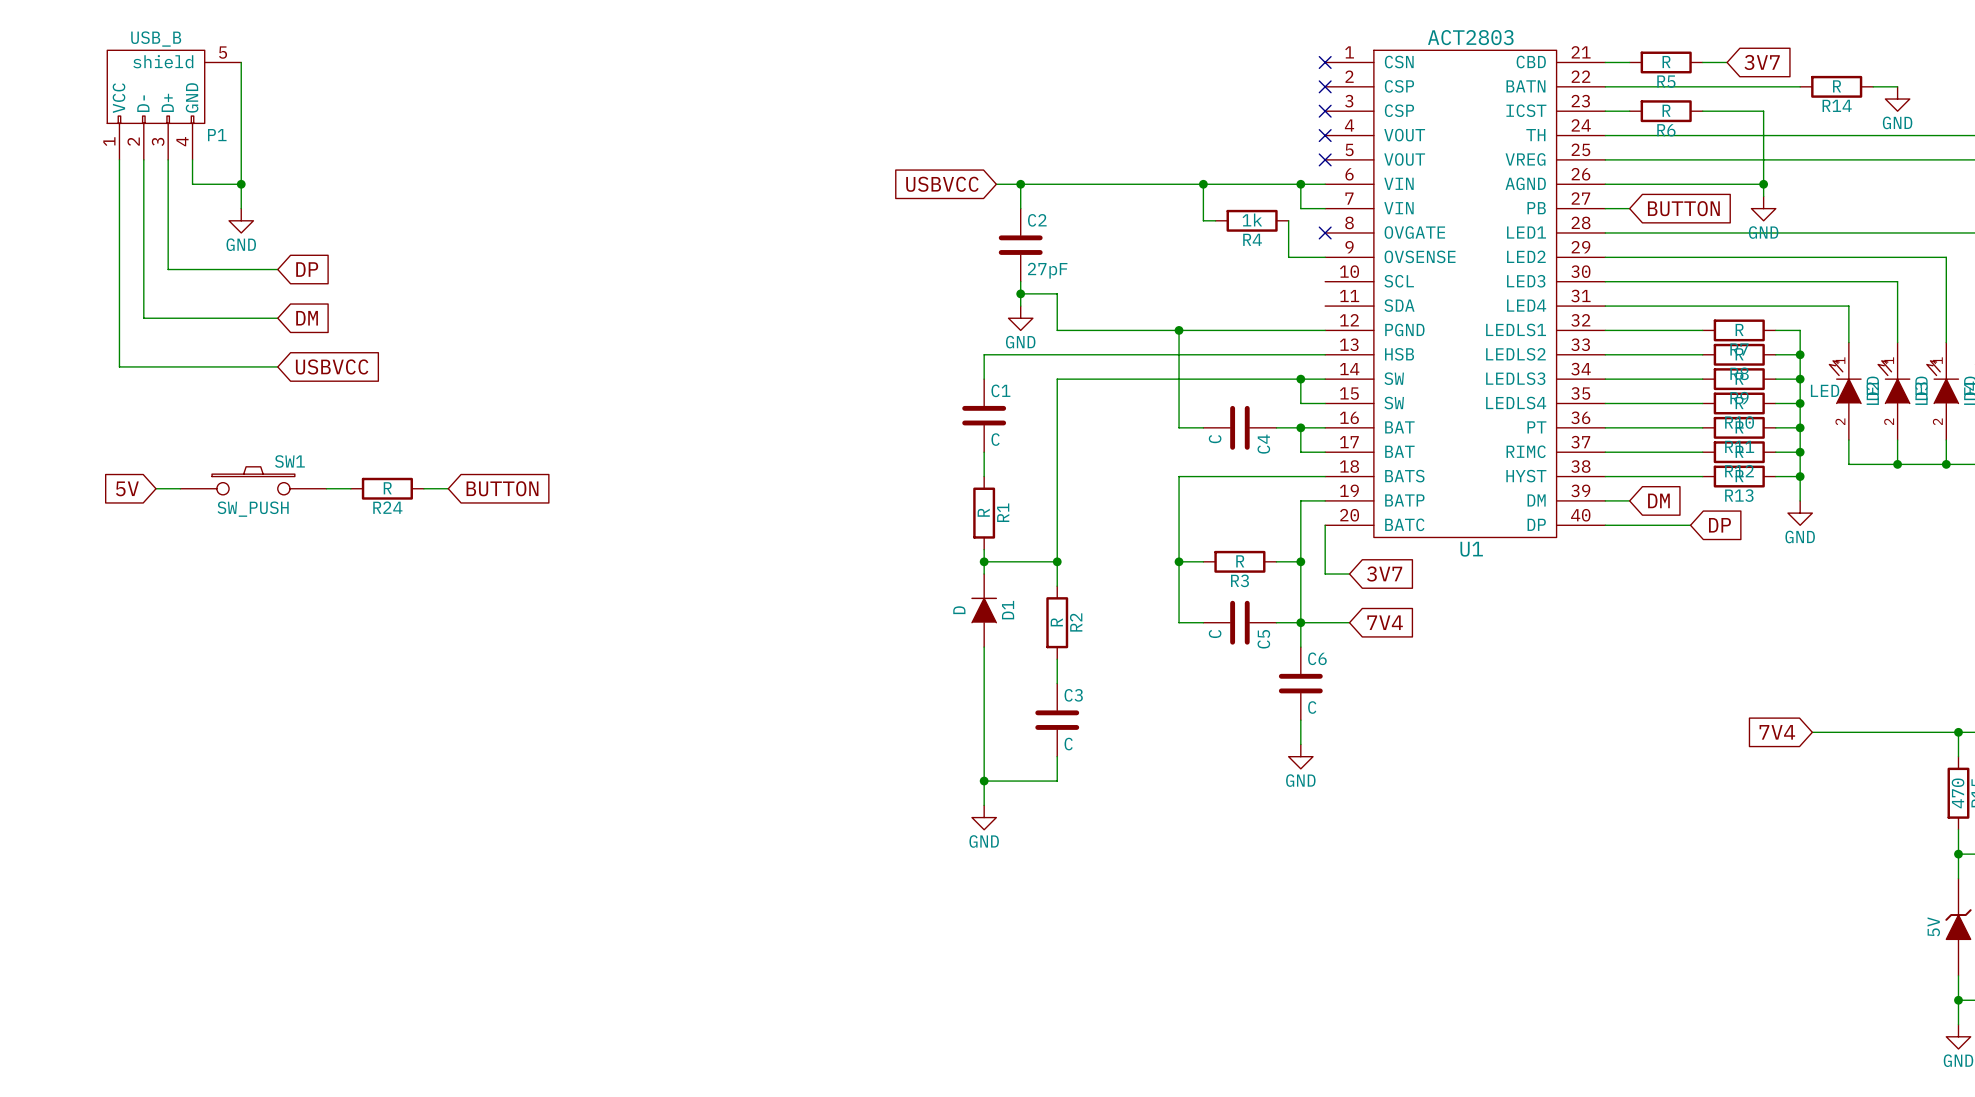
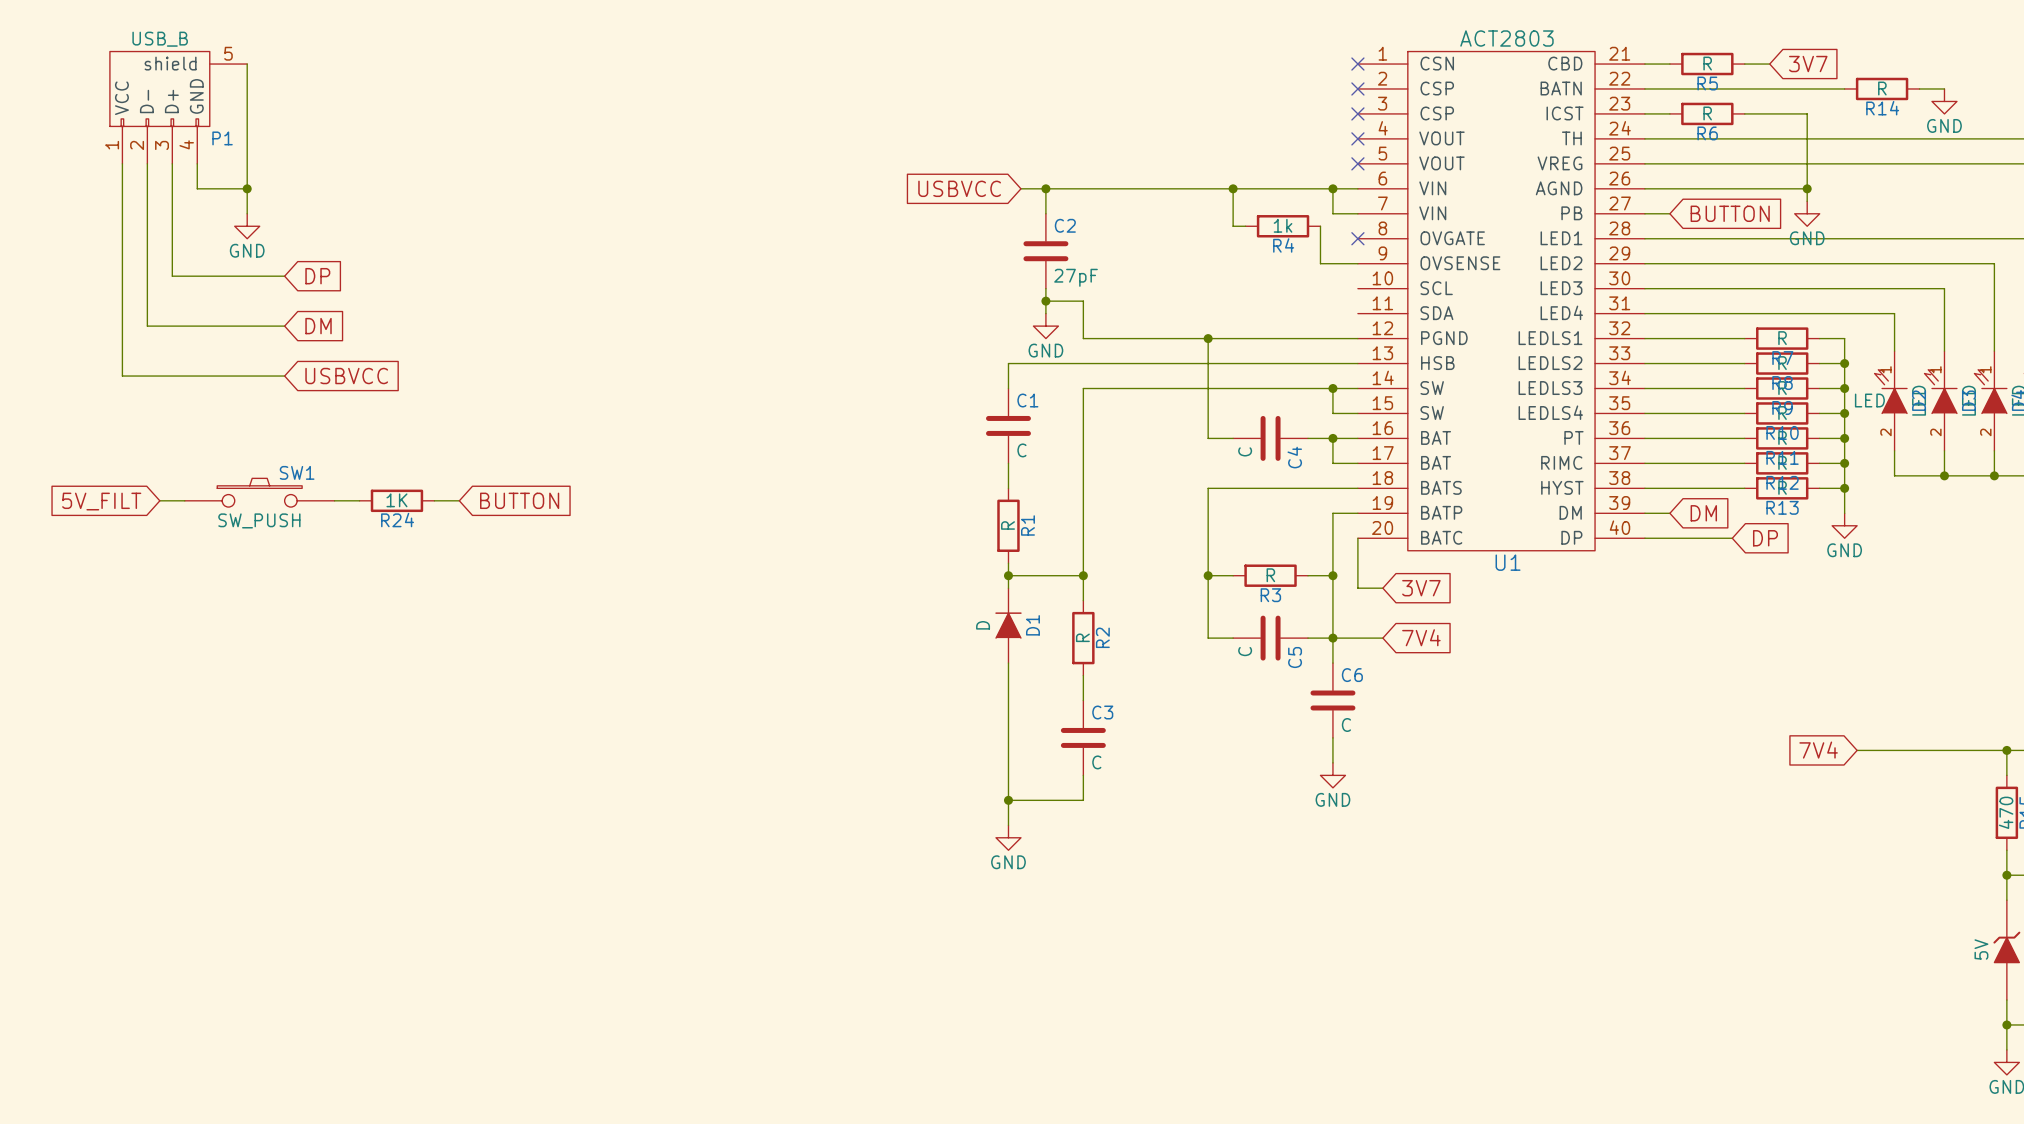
global label: 5V (127, 488) -> 5V_FILT (101, 501)
R24 value: R (387, 488) -> 1K (396, 500)

